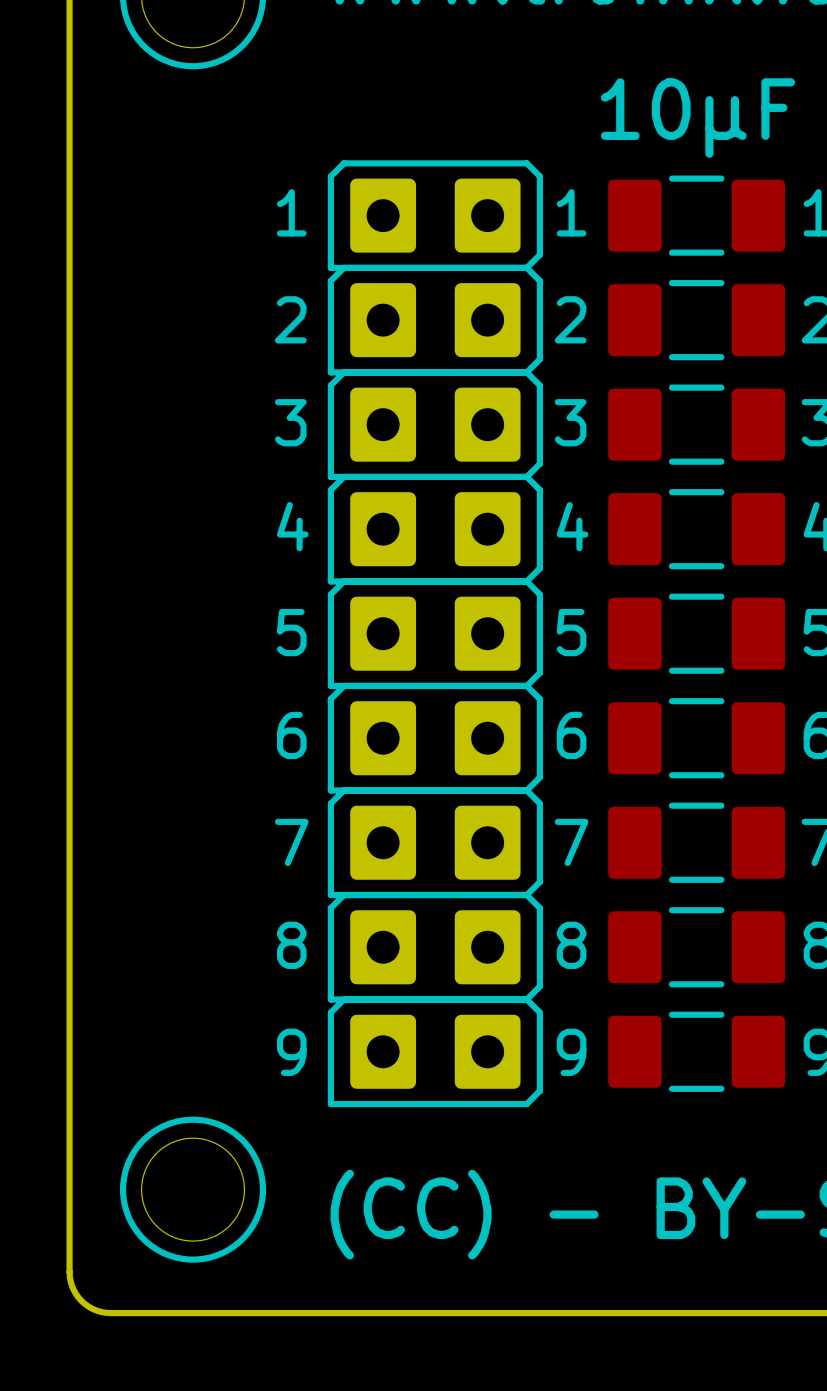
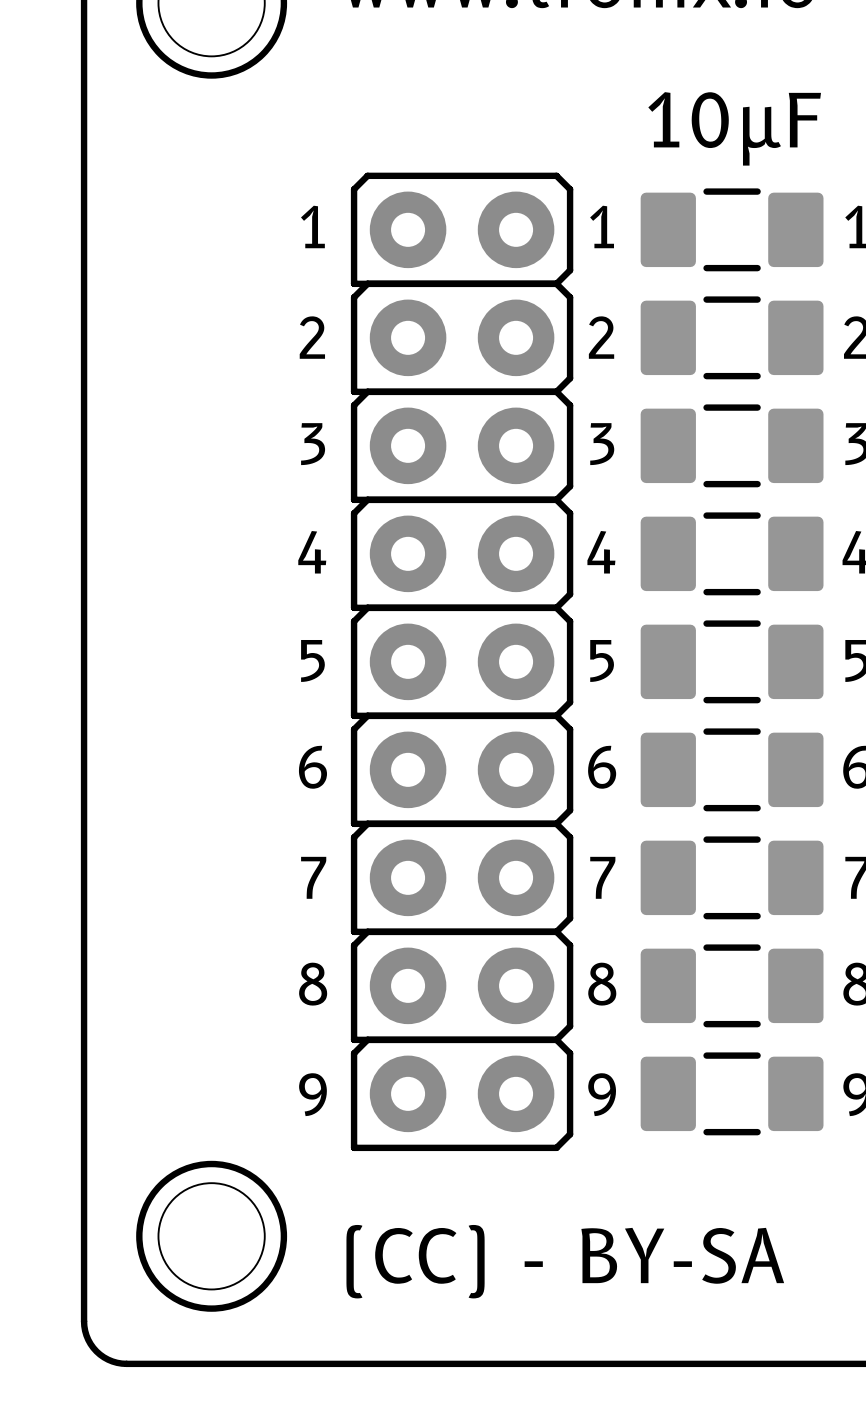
part footprint: [327, 160, 543, 271] -> [350, 172, 574, 288]
part footprint: [327, 264, 543, 376] -> [350, 280, 574, 396]
part footprint: [327, 369, 543, 481] -> [350, 388, 574, 504]
part footprint: [327, 473, 543, 585] -> [350, 496, 574, 612]
part footprint: [327, 578, 543, 690] -> [350, 604, 574, 720]
part footprint: [327, 682, 543, 794] -> [350, 712, 574, 828]
part footprint: [327, 787, 543, 899] -> [350, 820, 574, 936]
part footprint: [327, 891, 543, 1003] -> [350, 928, 574, 1044]
part footprint: [327, 996, 543, 1108] -> [350, 1036, 574, 1152]

